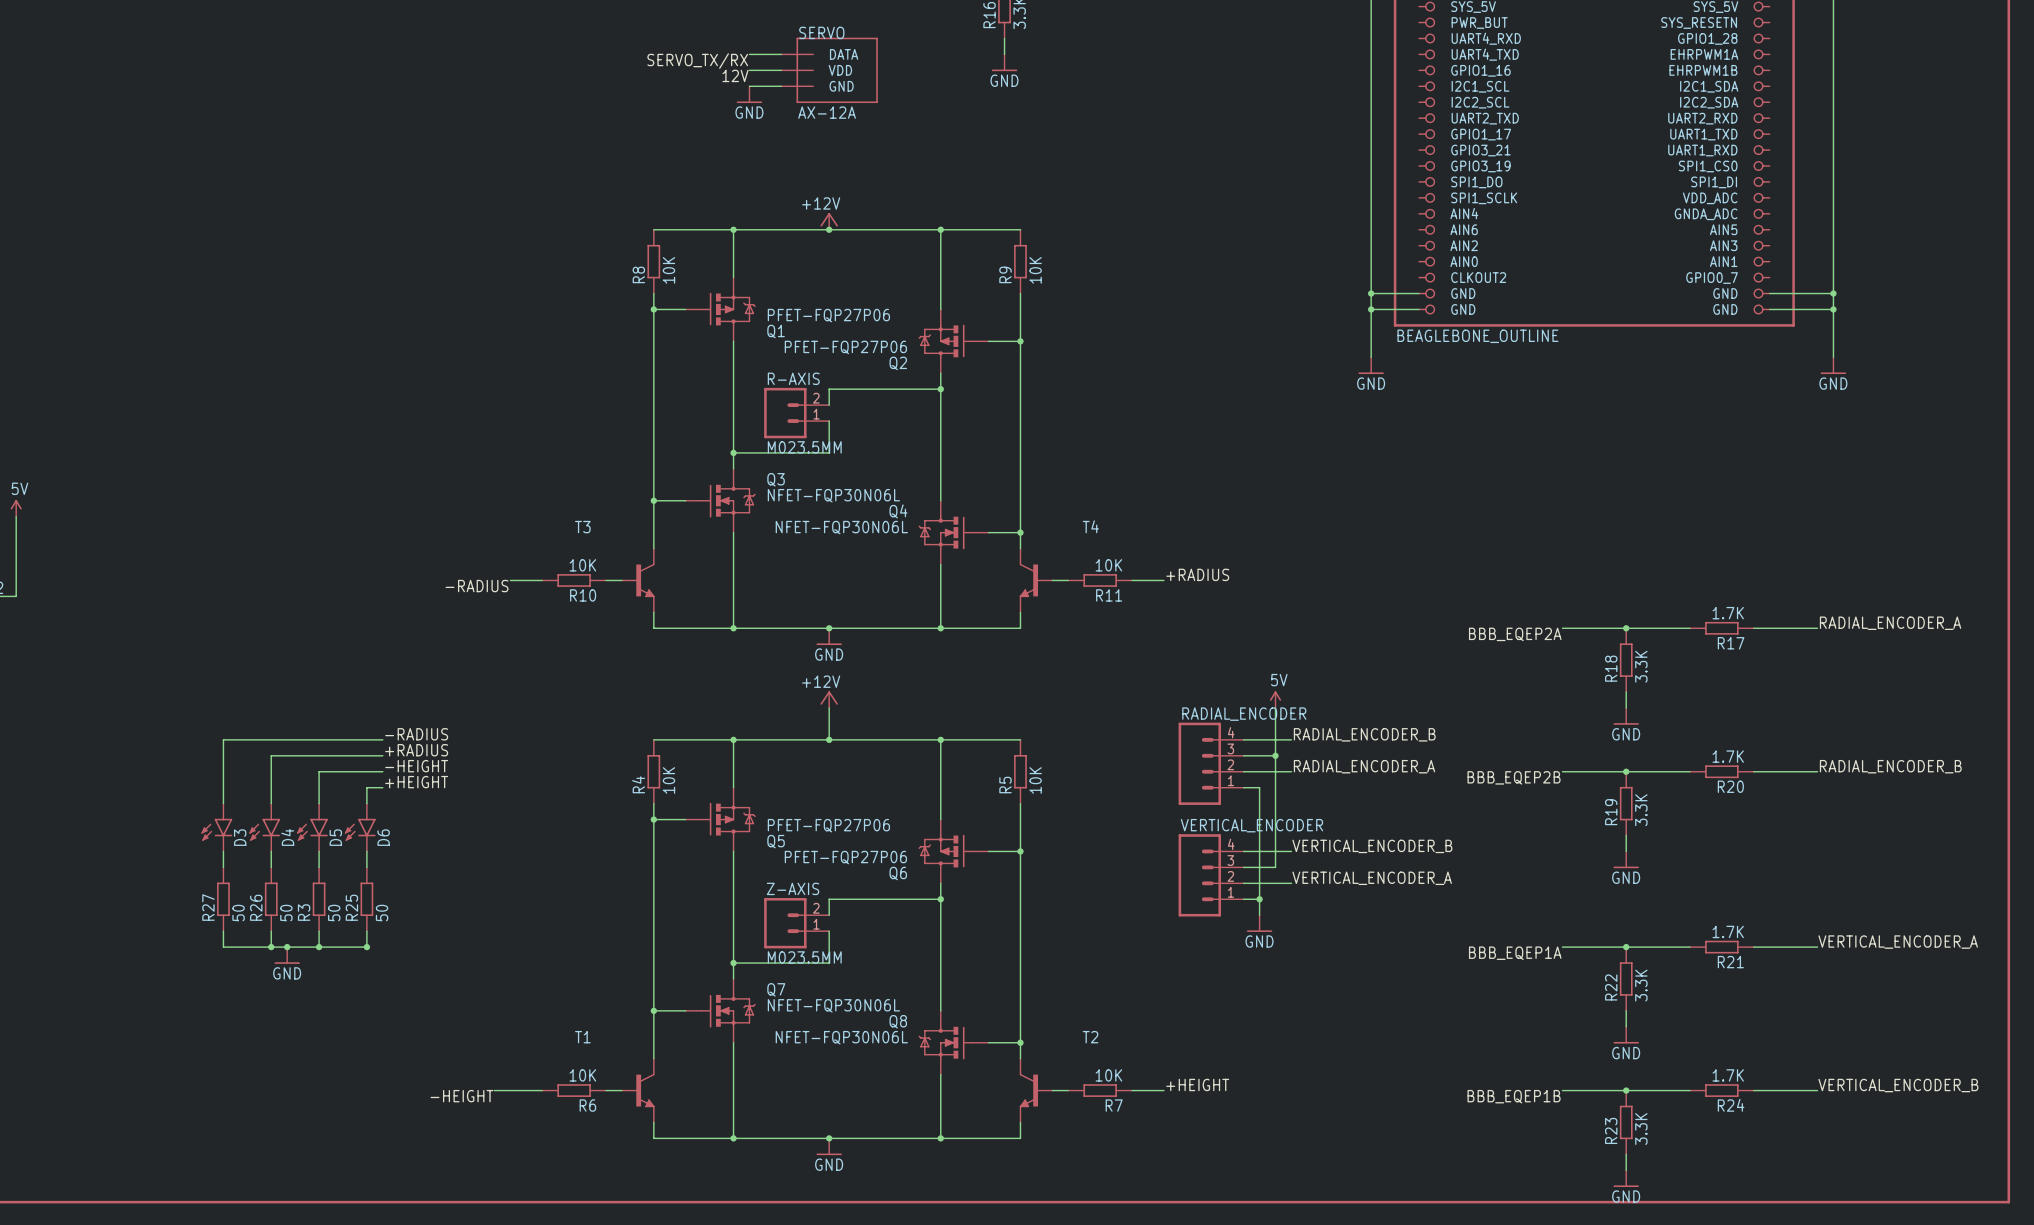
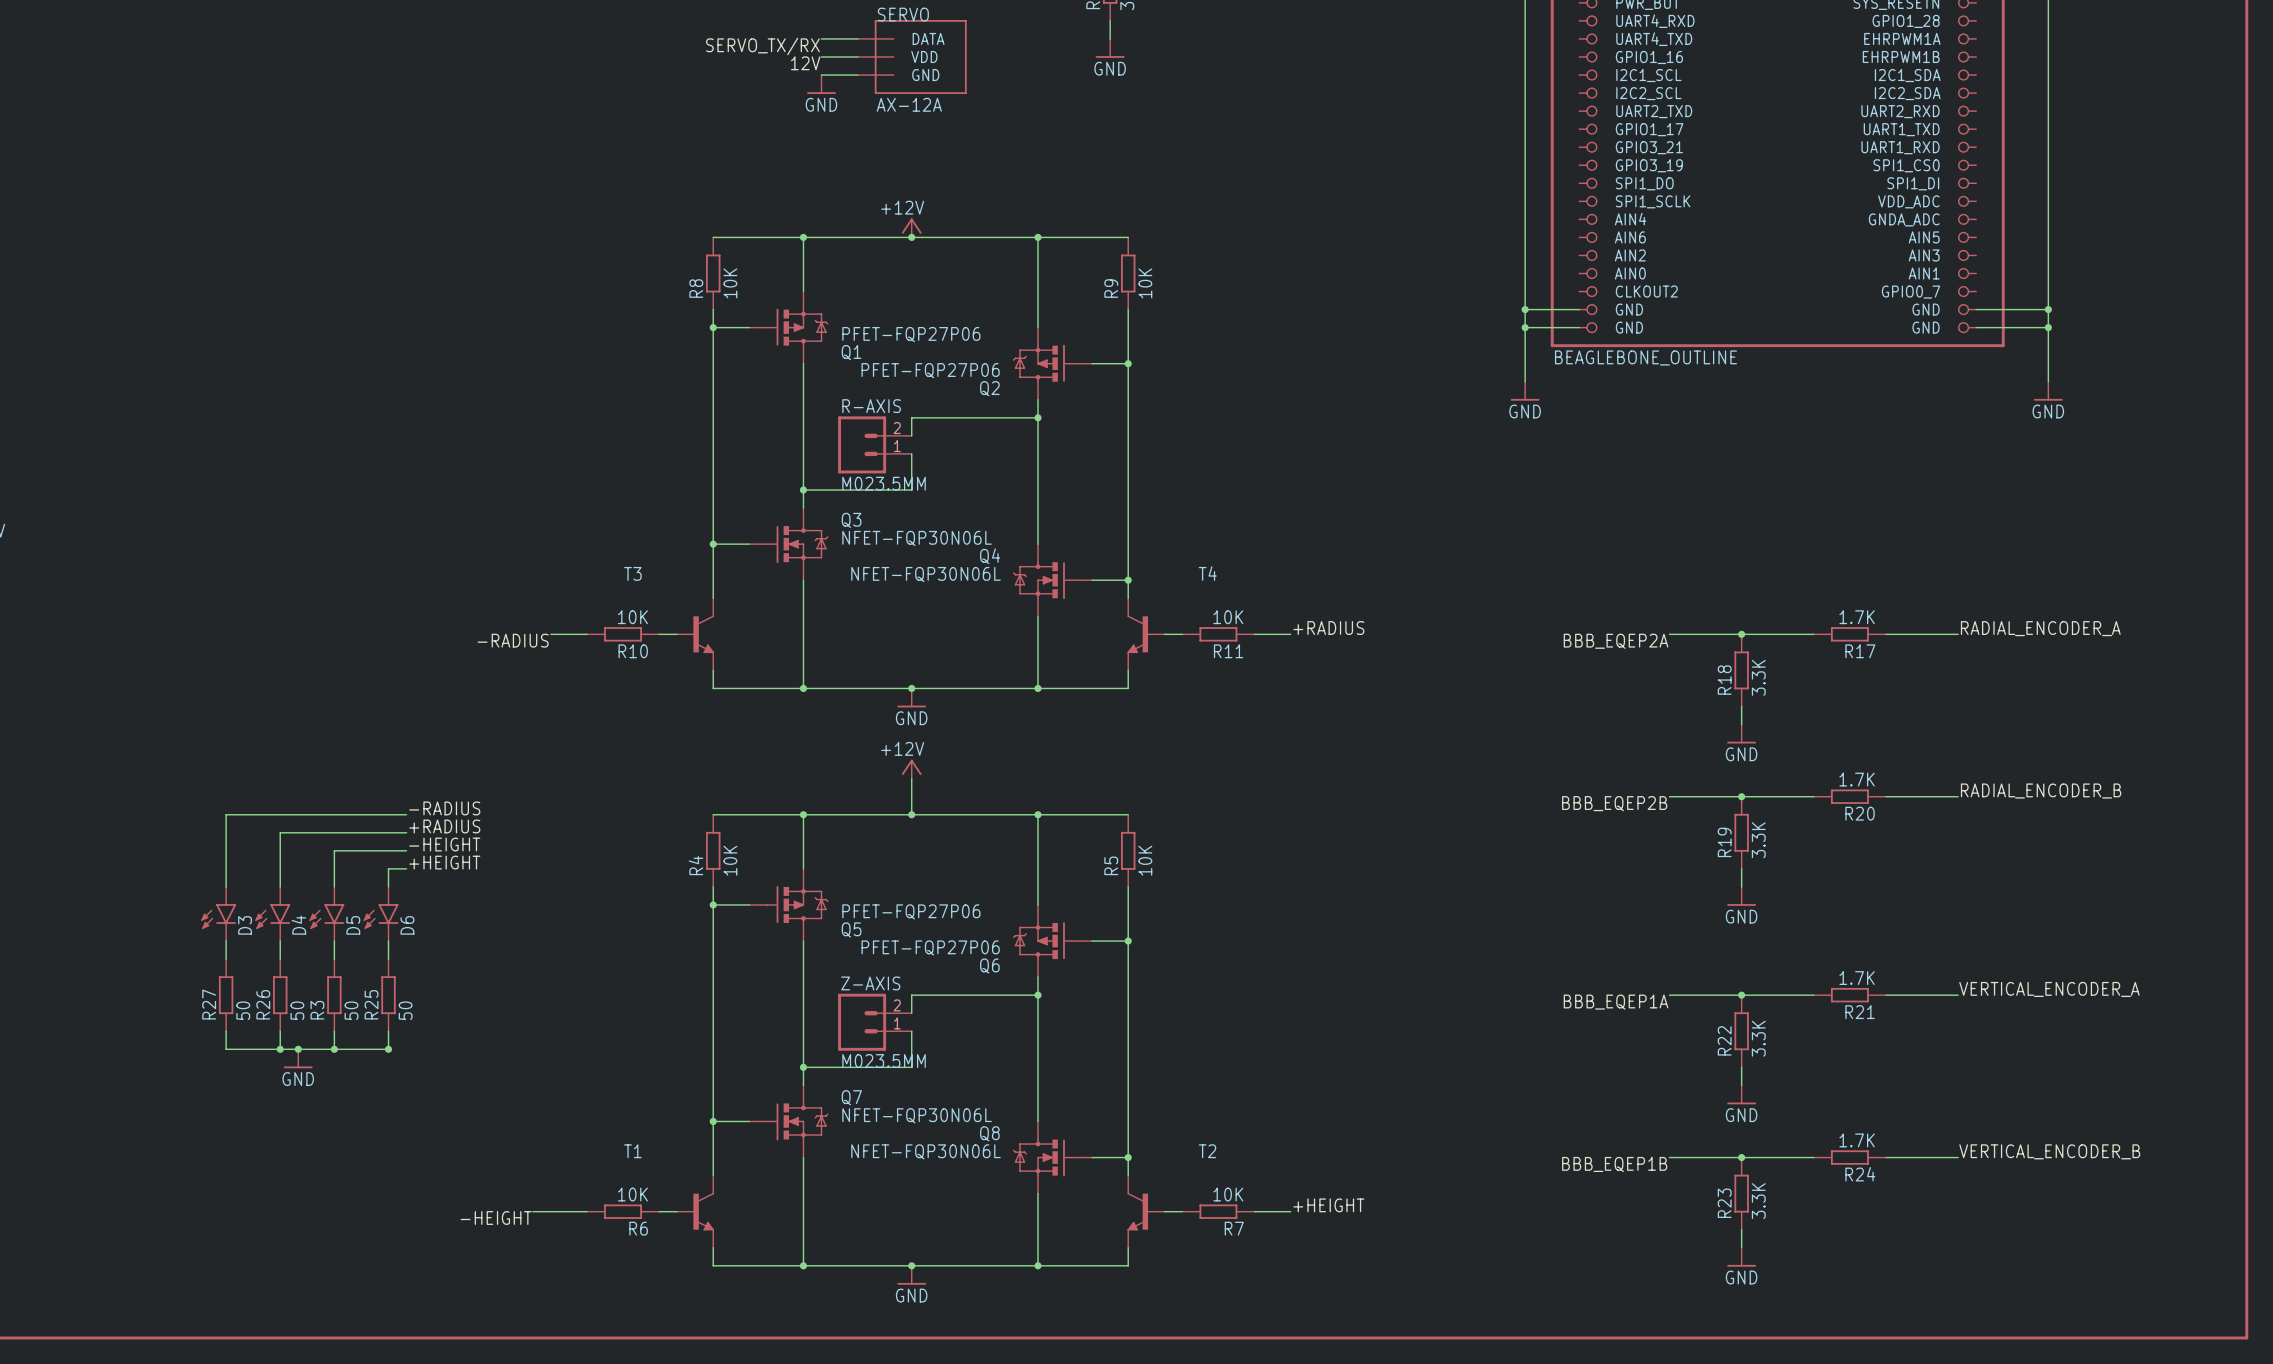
junction: none -> (1741, 634)
label position: RADIAL_ENCODER_A (1890, 623) -> RADIAL_ENCODER_A (2040, 628)
wire: (1562, 628) (1689, 628) -> (1669, 634) (1813, 634)
junction: (1626, 628) -> none
R17 position: (1721, 628) -> (1849, 634)
wire: (1753, 628) (1817, 628) -> (1885, 634) (1958, 634)
label position: BBB_EQEP2A (1515, 634) -> BBB_EQEP2A (1616, 641)
R18 position: (1626, 660) -> (1741, 670)
power symbol: none -> GND (1741, 734)
wire: (1626, 692) (1626, 707) -> (1741, 706) (1741, 724)
power symbol: 5V (1275, 699) -> none
wire: (1275, 707) (1275, 867) (1243, 867) -> none
power symbol: GND (1626, 716) -> none
junction: none -> (1741, 796)
label: RADIAL_ENCODER_B (1364, 734) -> none
wire: (1243, 739) (1291, 739) -> none
wire: (1243, 755) (1275, 755) -> none
junction: (1275, 755) -> none
RADIAL_ENCODER: (1211, 763) -> none
label: RADIAL_ENCODER_A (1364, 766) -> none
label position: RADIAL_ENCODER_B (1890, 766) -> RADIAL_ENCODER_B (2041, 791)
wire: (1243, 771) (1291, 771) -> none
wire: (1562, 771) (1689, 771) -> (1669, 796) (1813, 796)
junction: (1626, 771) -> none
R20 position: (1721, 771) -> (1849, 796)
wire: (1753, 771) (1817, 771) -> (1885, 796) (1958, 796)
label position: BBB_EQEP2B (1514, 777) -> BBB_EQEP2B (1614, 803)
wire: (1243, 787) (1259, 787) (1259, 915) -> none
R19 position: (1626, 803) -> (1741, 832)
power symbol: none -> GND (1741, 896)
wire: (1626, 835) (1626, 851) -> (1741, 868) (1741, 886)
label: VERTICAL_ENCODER_B (1372, 846) -> none
wire: (1243, 851) (1291, 851) -> none
power symbol: GND (1626, 859) -> none
VERTICAL_ENCODER: (1211, 875) -> none
label: VERTICAL_ENCODER_A (1372, 878) -> none
wire: (1243, 883) (1291, 883) -> none
wire: (1243, 899) (1259, 899) -> none
junction: (1259, 899) -> none
junction: none -> (1741, 995)
power symbol: GND (1259, 923) -> none
label position: VERTICAL_ENCODER_A (1898, 942) -> VERTICAL_ENCODER_A (2049, 989)
wire: (1562, 947) (1689, 947) -> (1669, 995) (1813, 995)
junction: (1626, 947) -> none
R21 position: (1721, 947) -> (1849, 995)
wire: (1753, 947) (1817, 947) -> (1885, 995) (1958, 995)
label position: BBB_EQEP1A (1515, 953) -> BBB_EQEP1A (1616, 1002)
R22 position: (1626, 978) -> (1741, 1031)
power symbol: none -> GND (1741, 1094)
wire: (1626, 1010) (1626, 1026) -> (1741, 1067) (1741, 1085)
power symbol: GND (1626, 1035) -> none
junction: none -> (1741, 1157)
label position: VERTICAL_ENCODER_B (1898, 1085) -> VERTICAL_ENCODER_B (2049, 1151)
wire: (1562, 1090) (1689, 1090) -> (1669, 1157) (1813, 1157)
junction: (1626, 1090) -> none
R24 position: (1721, 1090) -> (1849, 1157)
wire: (1753, 1090) (1817, 1090) -> (1885, 1157) (1958, 1157)
label position: BBB_EQEP1B (1514, 1096) -> BBB_EQEP1B (1614, 1164)
R23 position: (1626, 1122) -> (1741, 1193)
power symbol: none -> GND (1741, 1257)
wire: (1626, 1154) (1626, 1170) -> (1741, 1229) (1741, 1247)
power symbol: GND (1626, 1178) -> none

